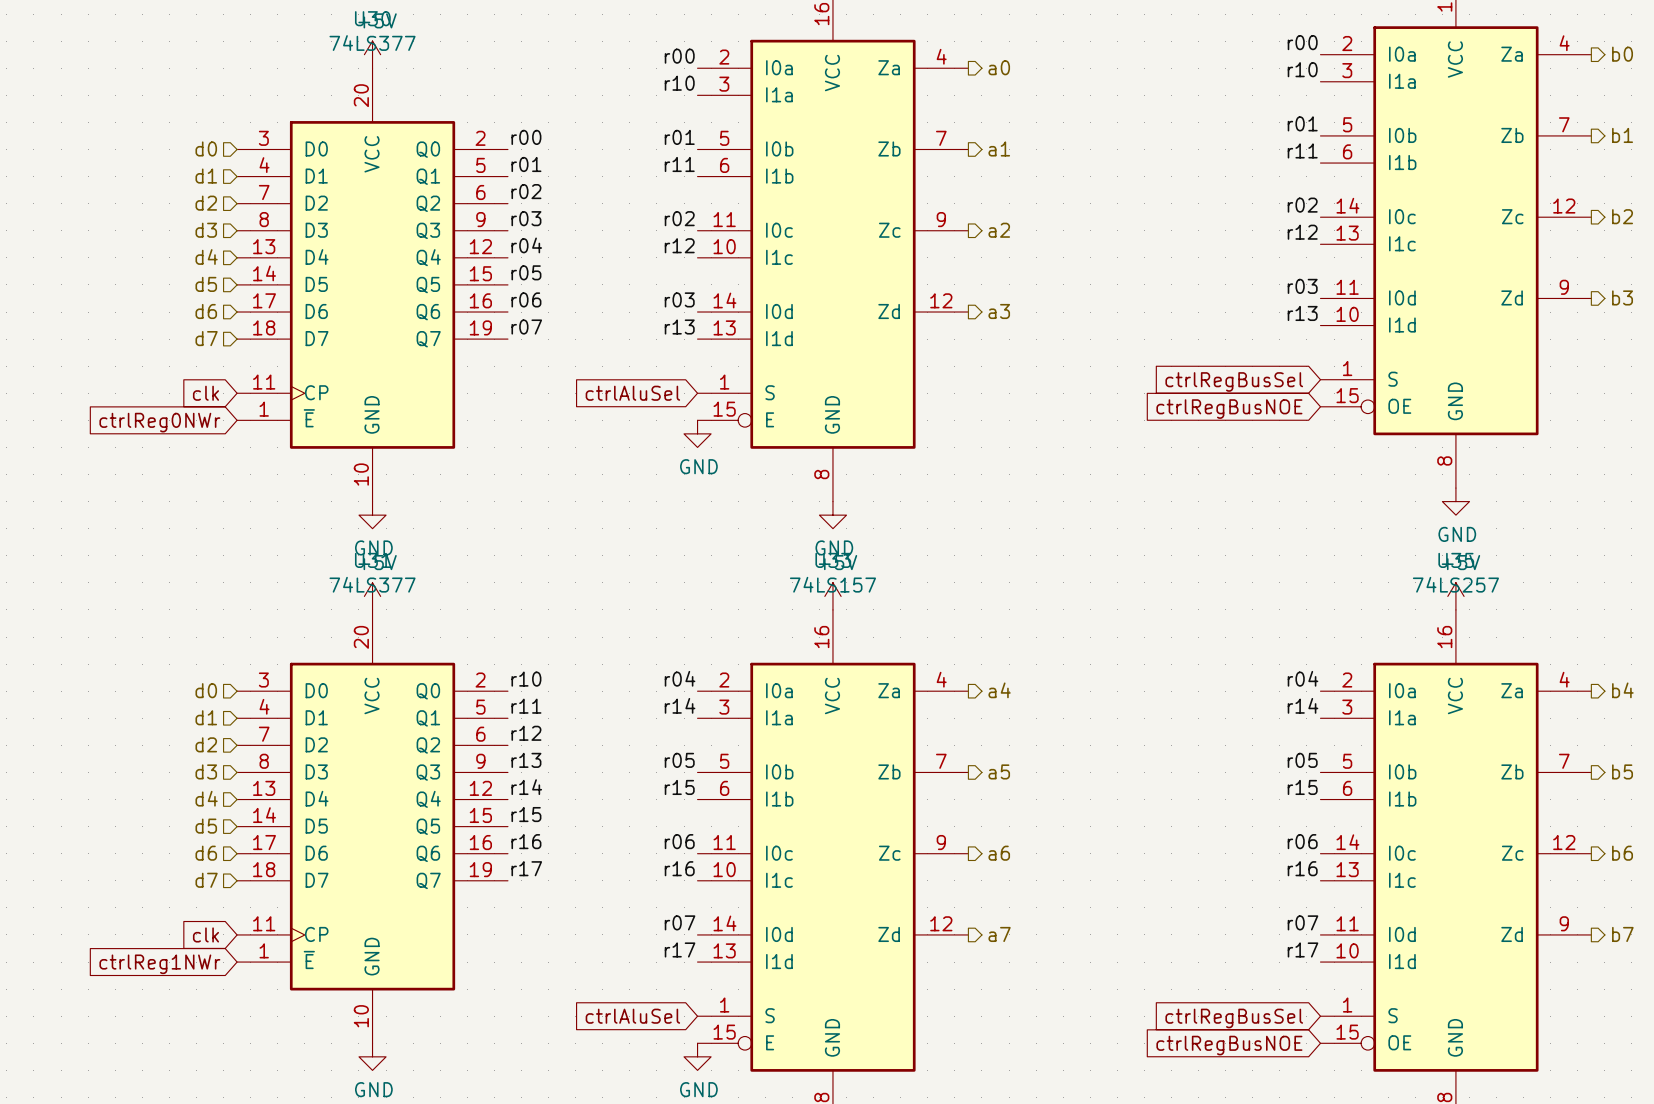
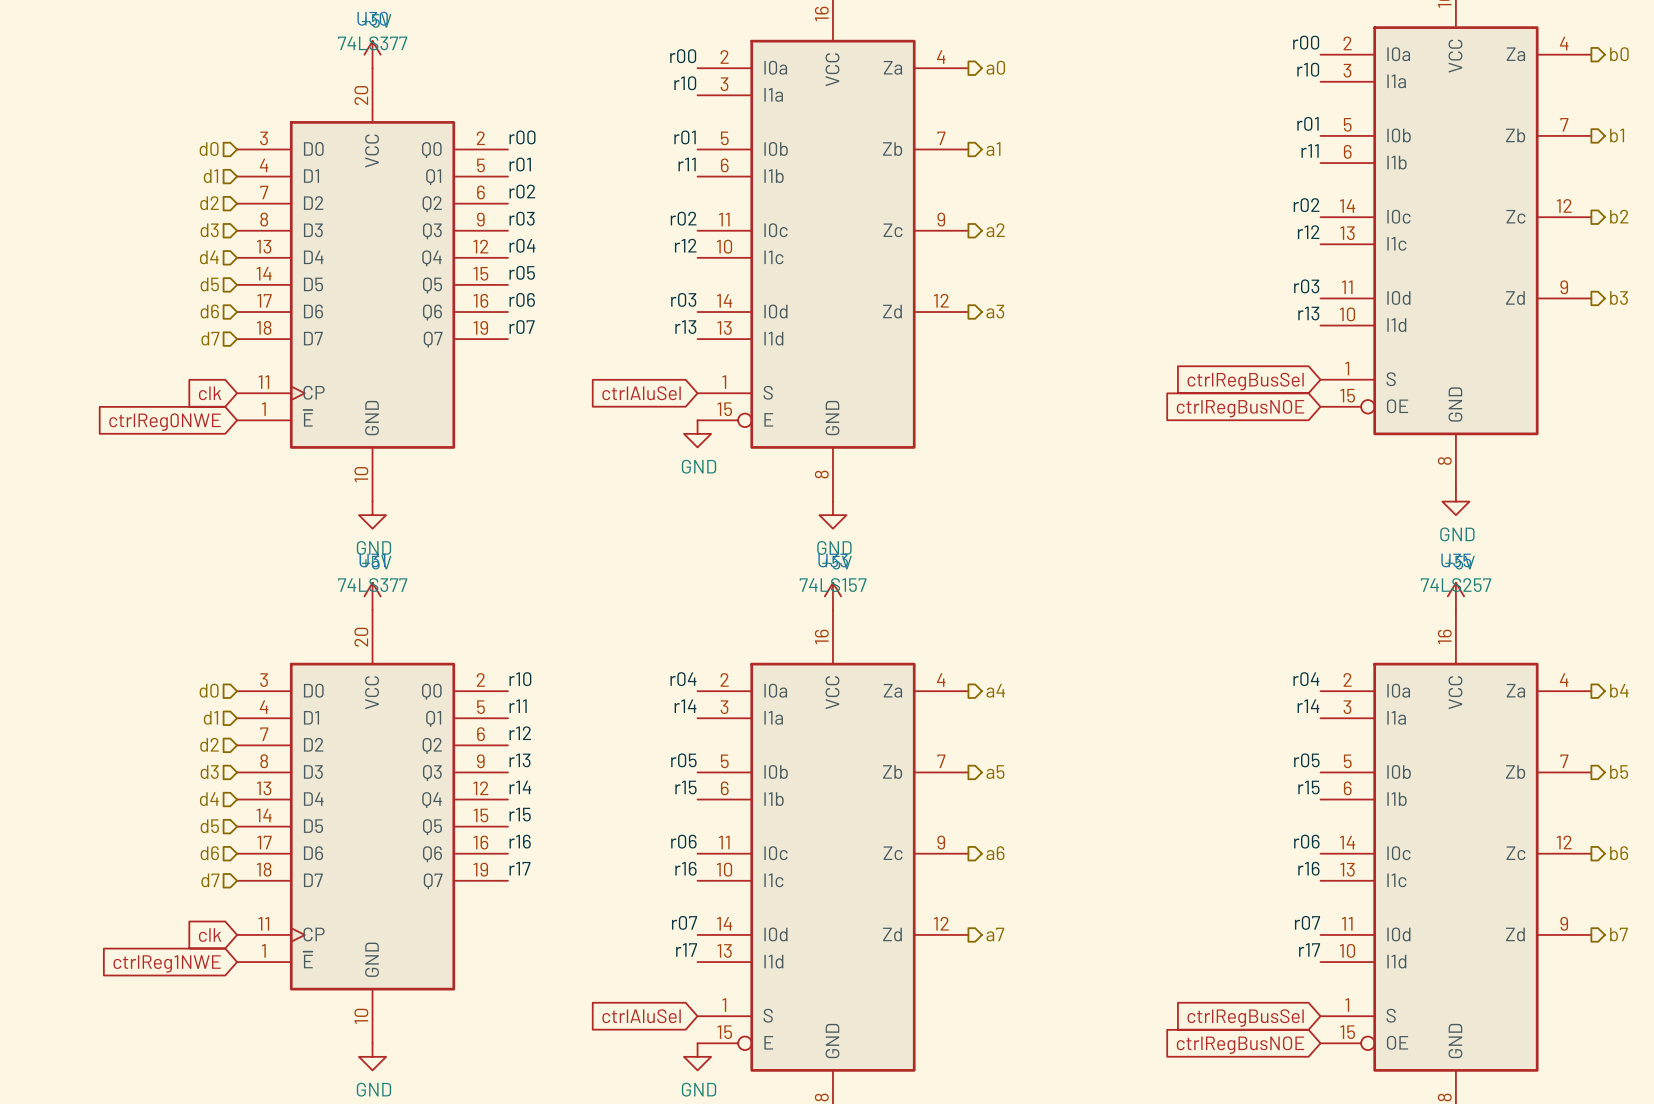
global label: ctrlReg0NWr (159, 422) -> ctrlReg0NWE (165, 422)
global label: ctrlReg1NWr (159, 964) -> ctrlReg1NWE (167, 963)

